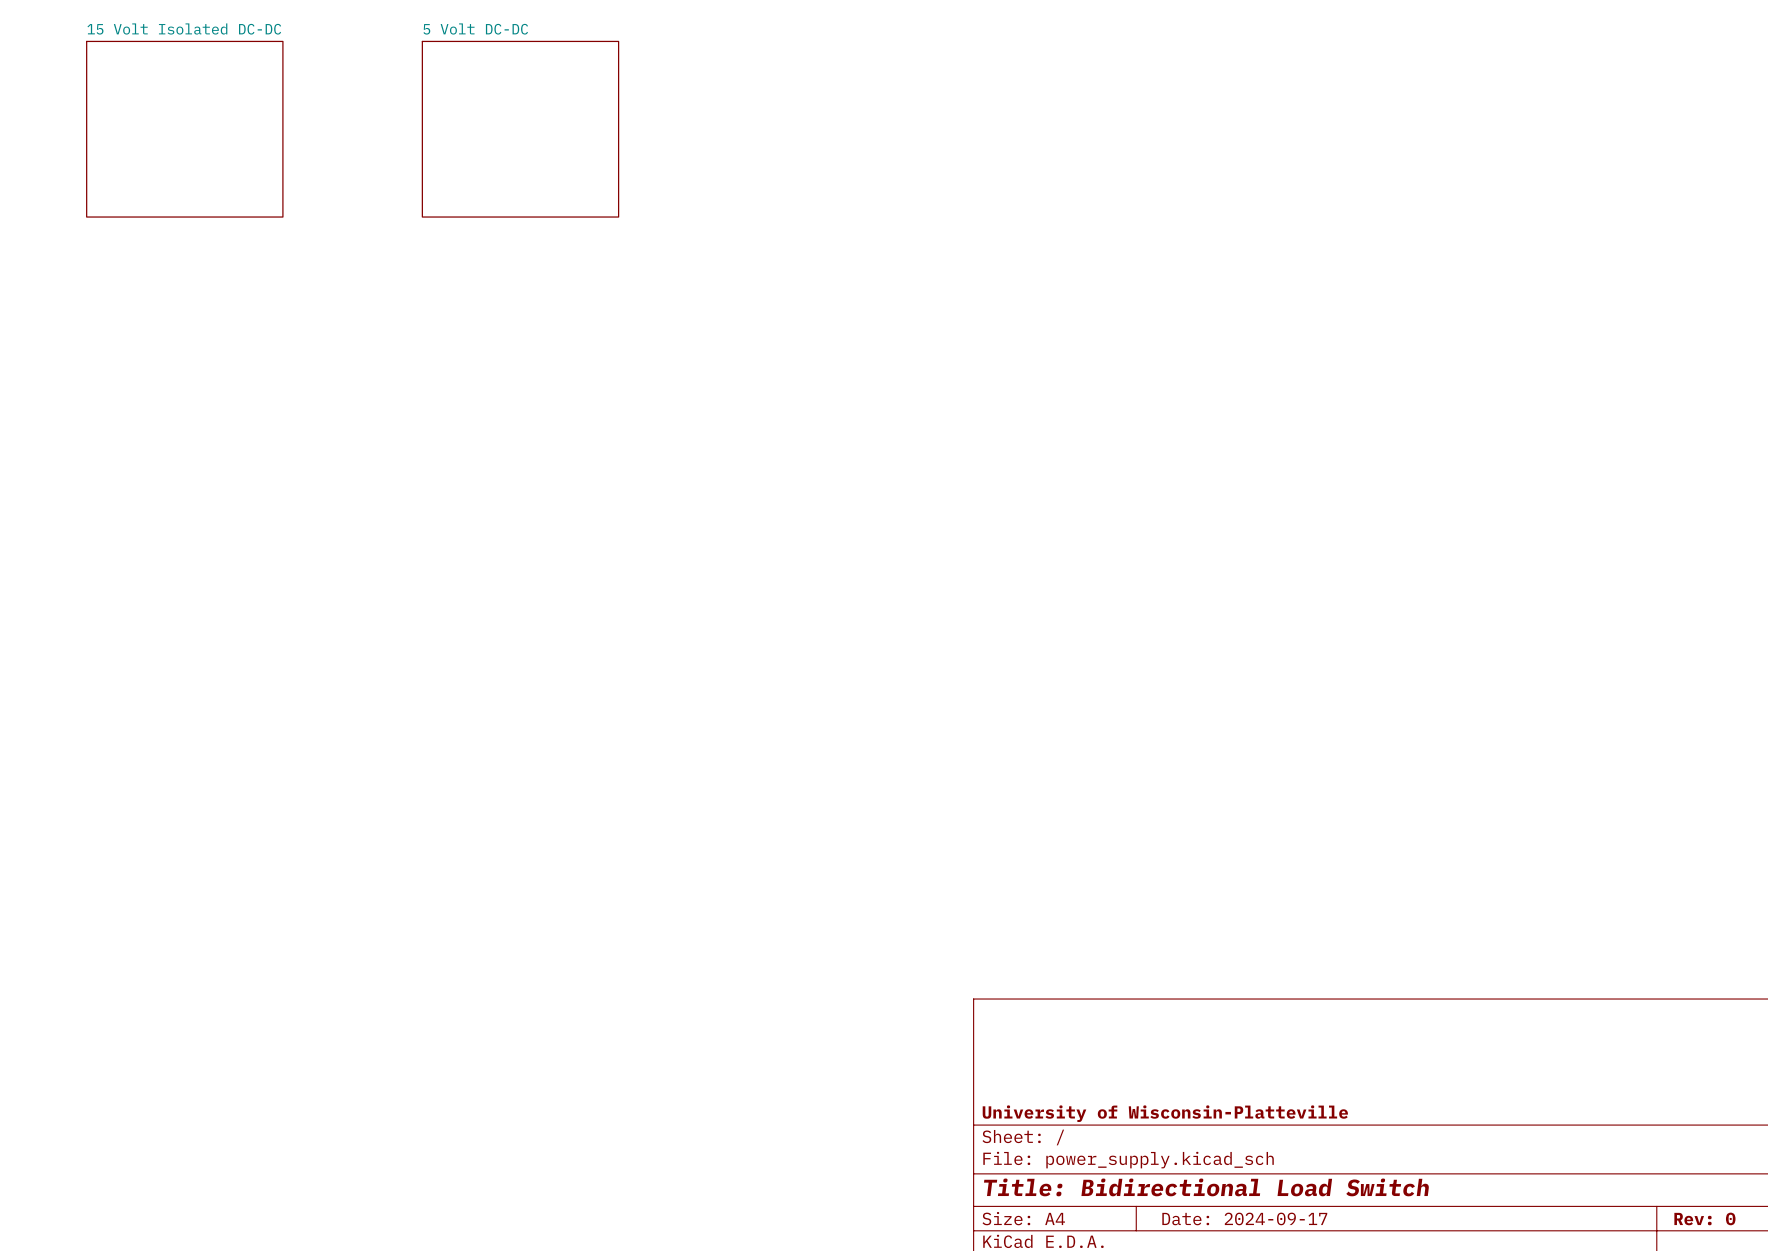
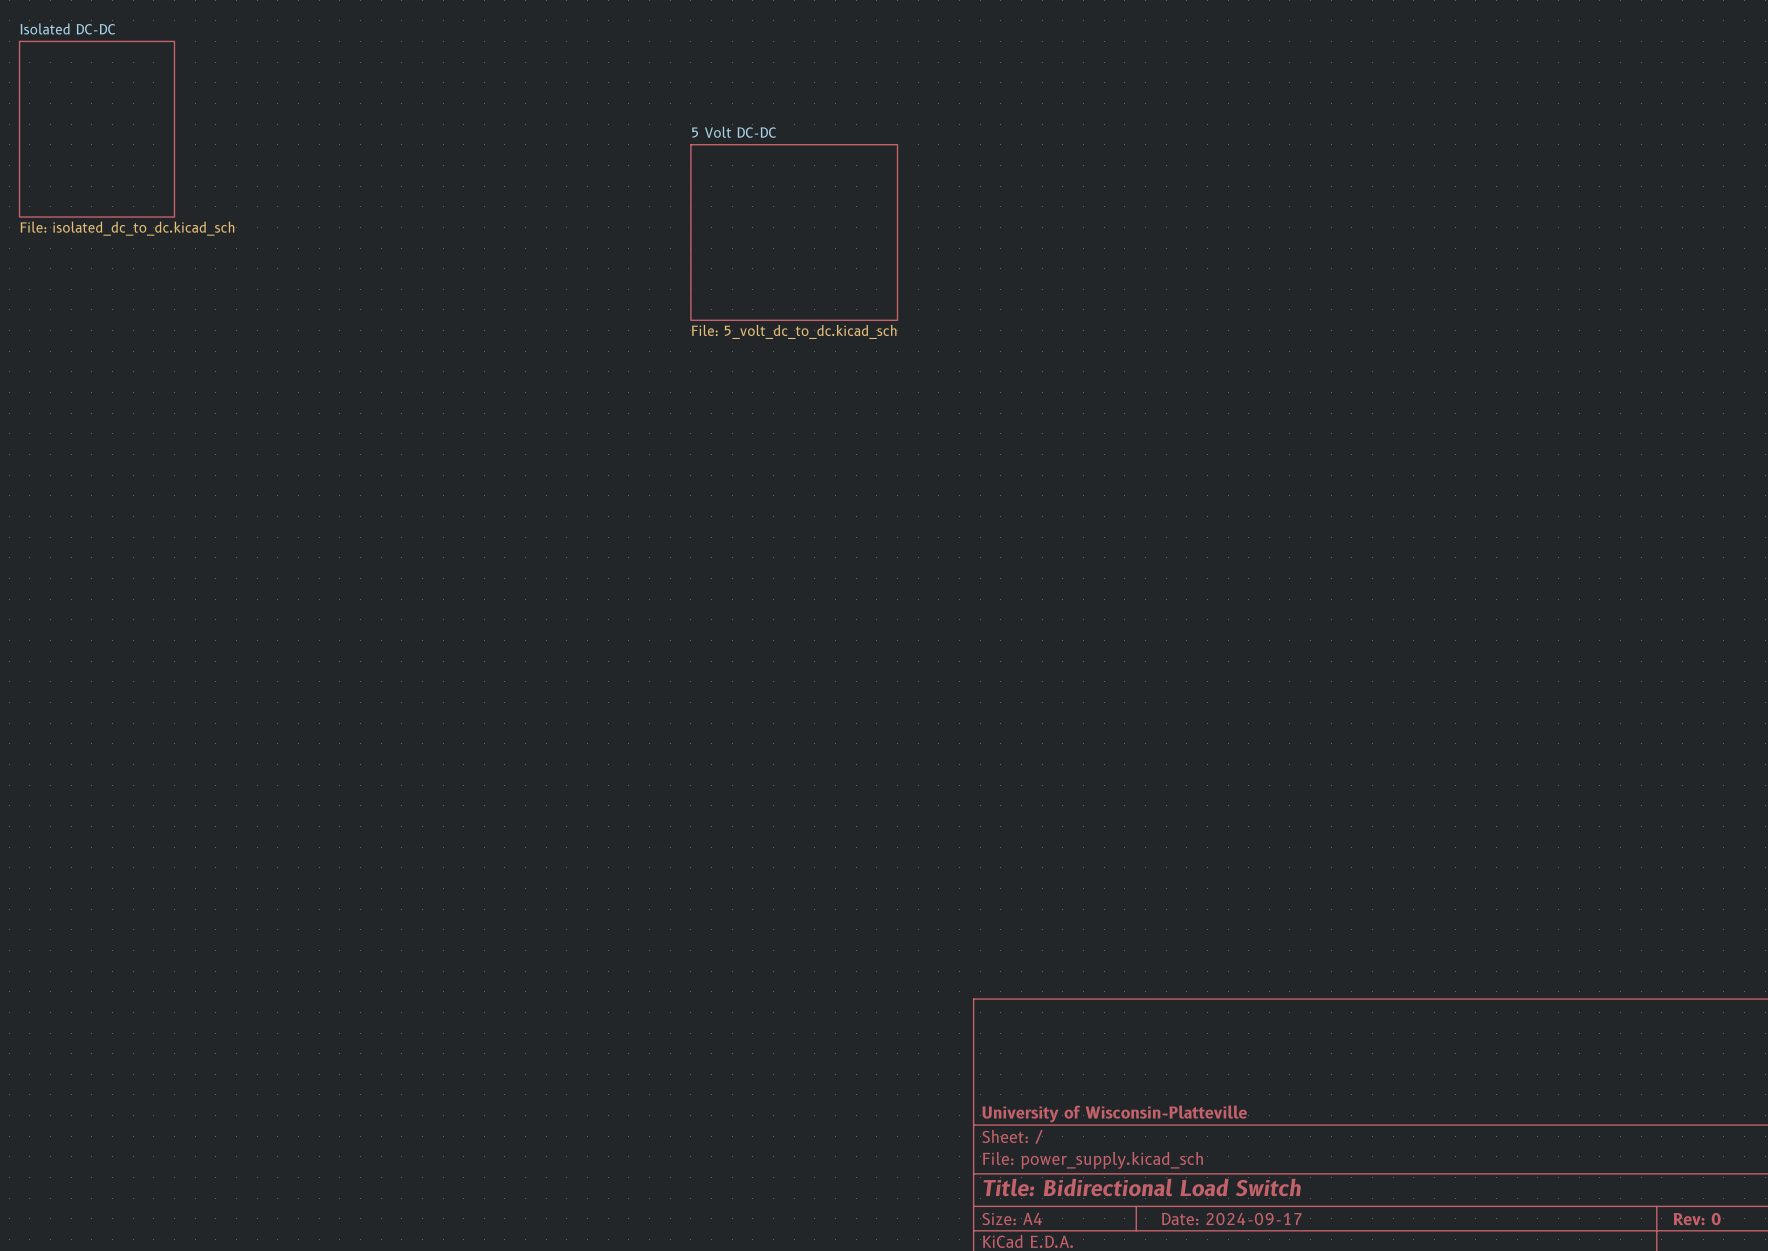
sheet 5 Volt DC-DC shape: [421, 40, 620, 218] -> [690, 144, 899, 321]
sheet Isolated DC-DC: none -> File: isolated_dc_to_dc.kicad_sch (96, 129)
sheet 15 Volt Isolated DC-DC: (184, 129) -> none
sheet 5 Volt DC-DC value: none -> File: 5_volt_dc_to_dc.kicad_sch (794, 331)

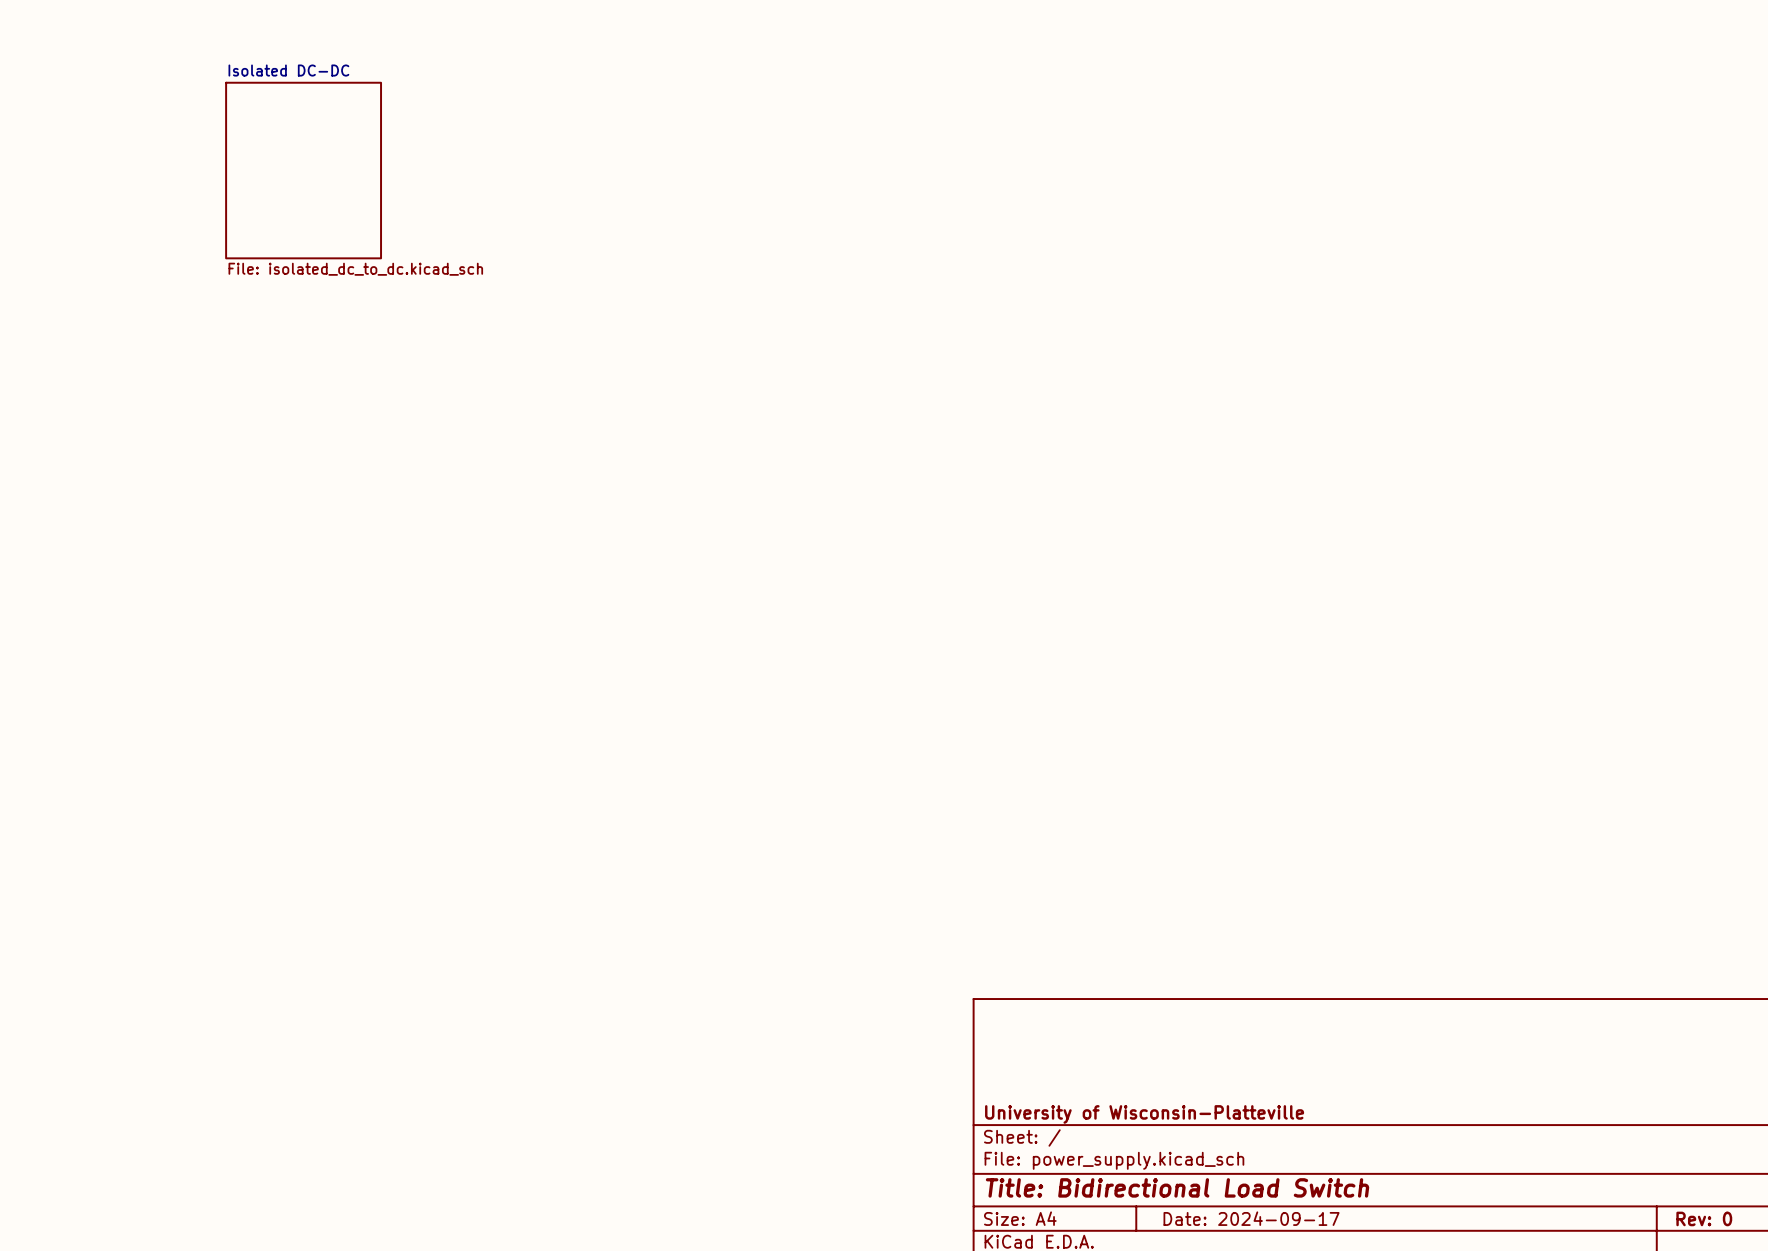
sheet Isolated DC-DC: File: isolated_dc_to_dc.kicad_sch (96, 129) -> none
sheet Isolated DC-DC: none -> File: isolated_dc_to_dc.kicad_sch (303, 170)
sheet 5 Volt DC-DC: File: 5_volt_dc_to_dc.kicad_sch (794, 232) -> none

